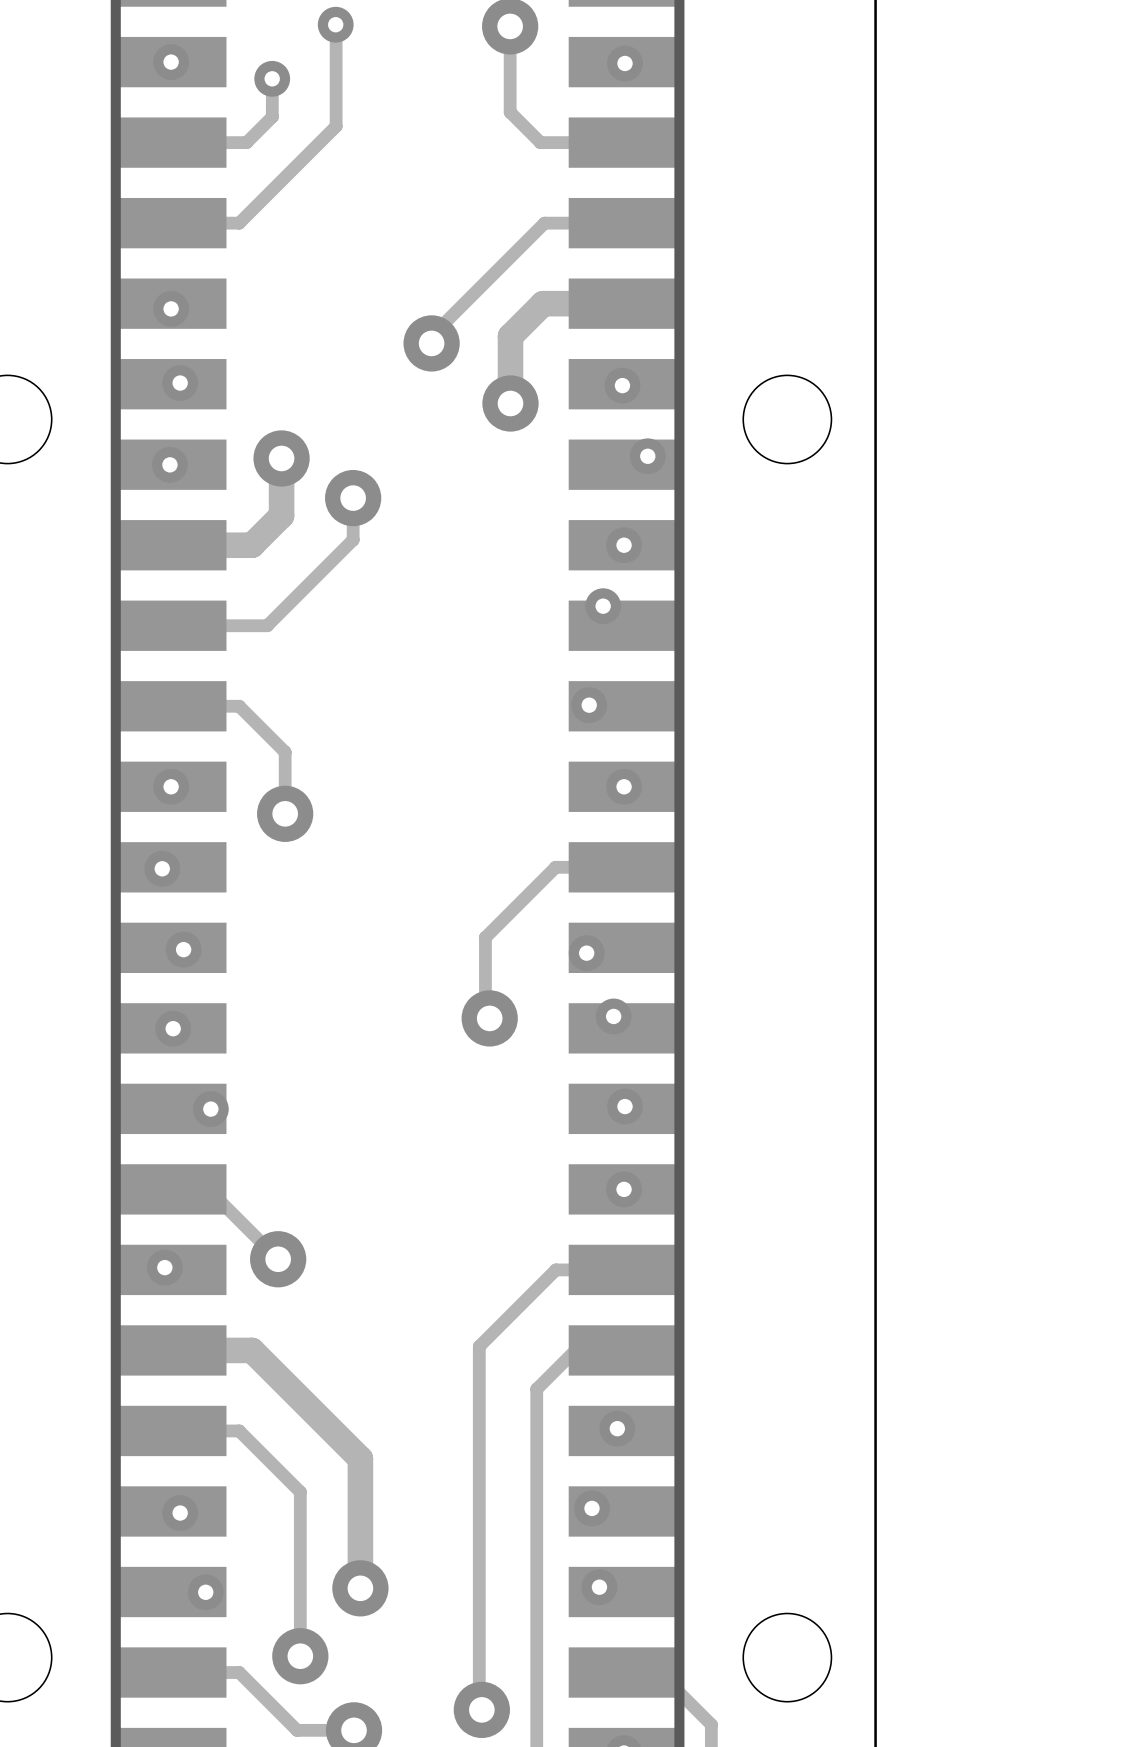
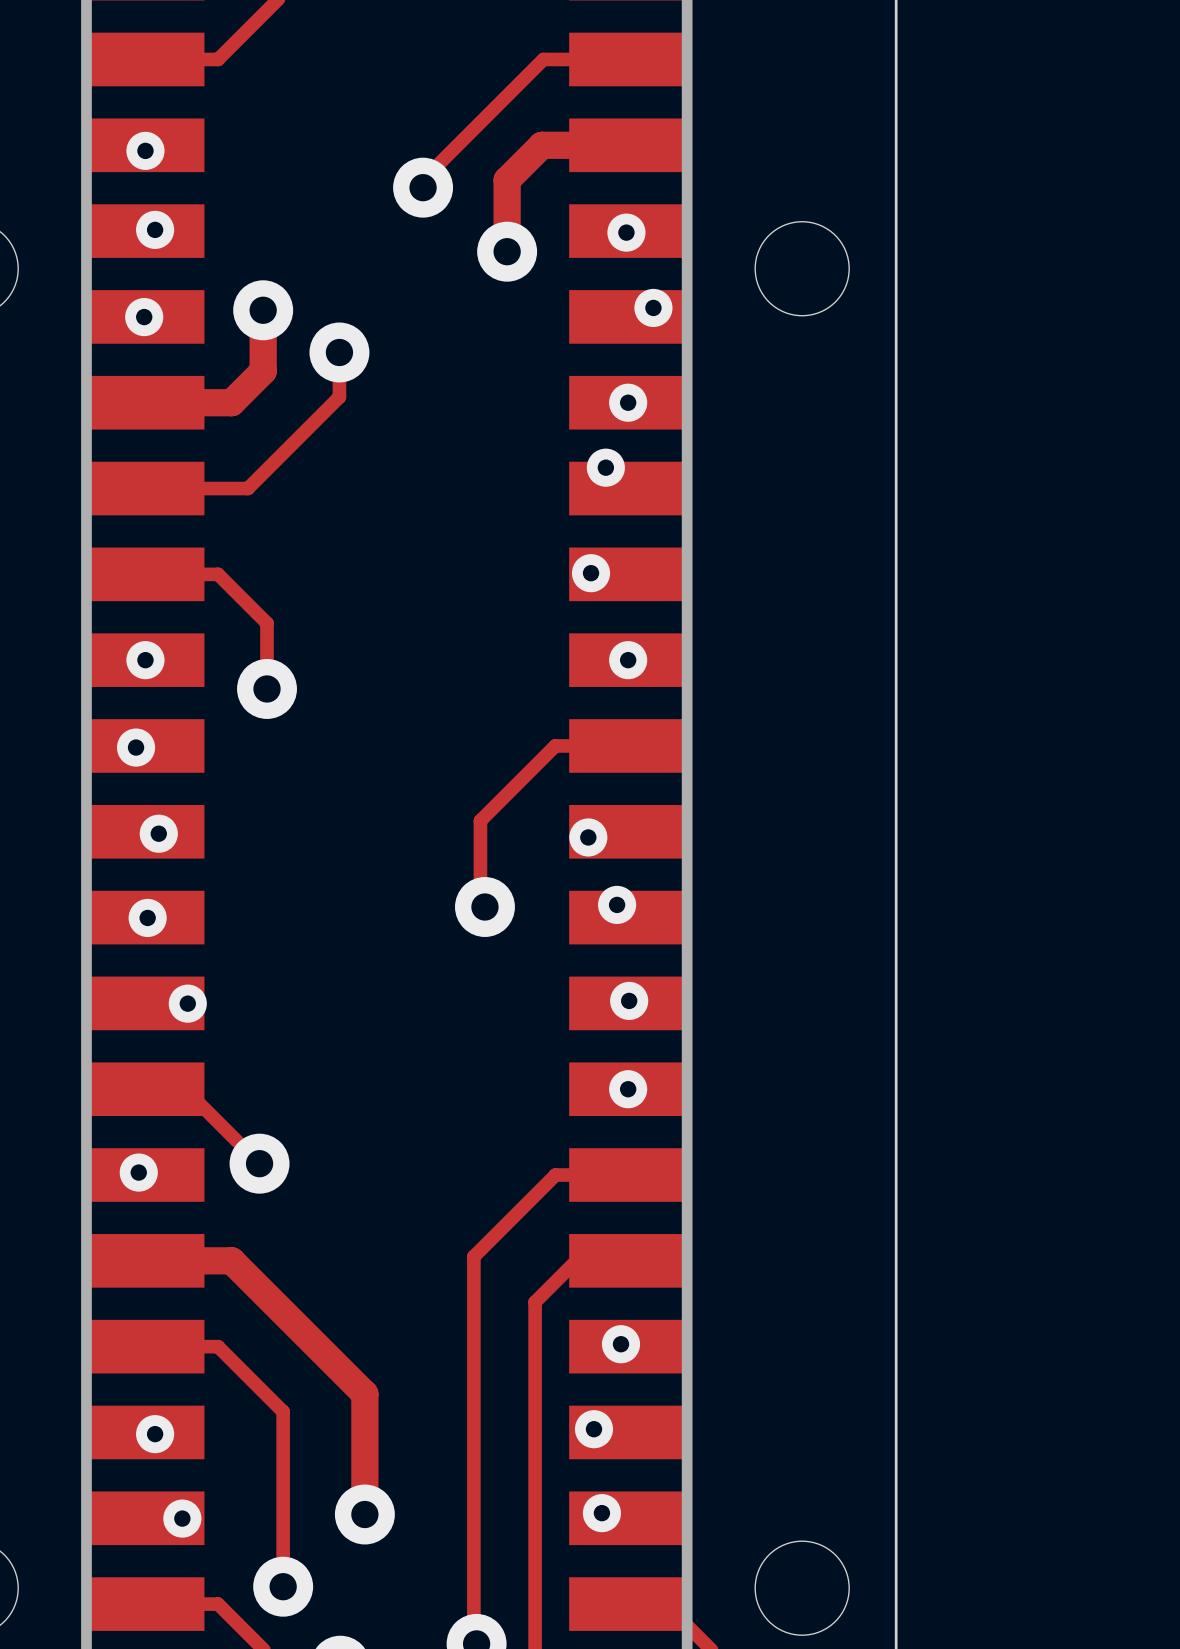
track: (360, 1458) (360, 1588) -> (347, 1376) (364, 1394) (364, 1514)
via position: (360, 1588) -> (364, 1514)

